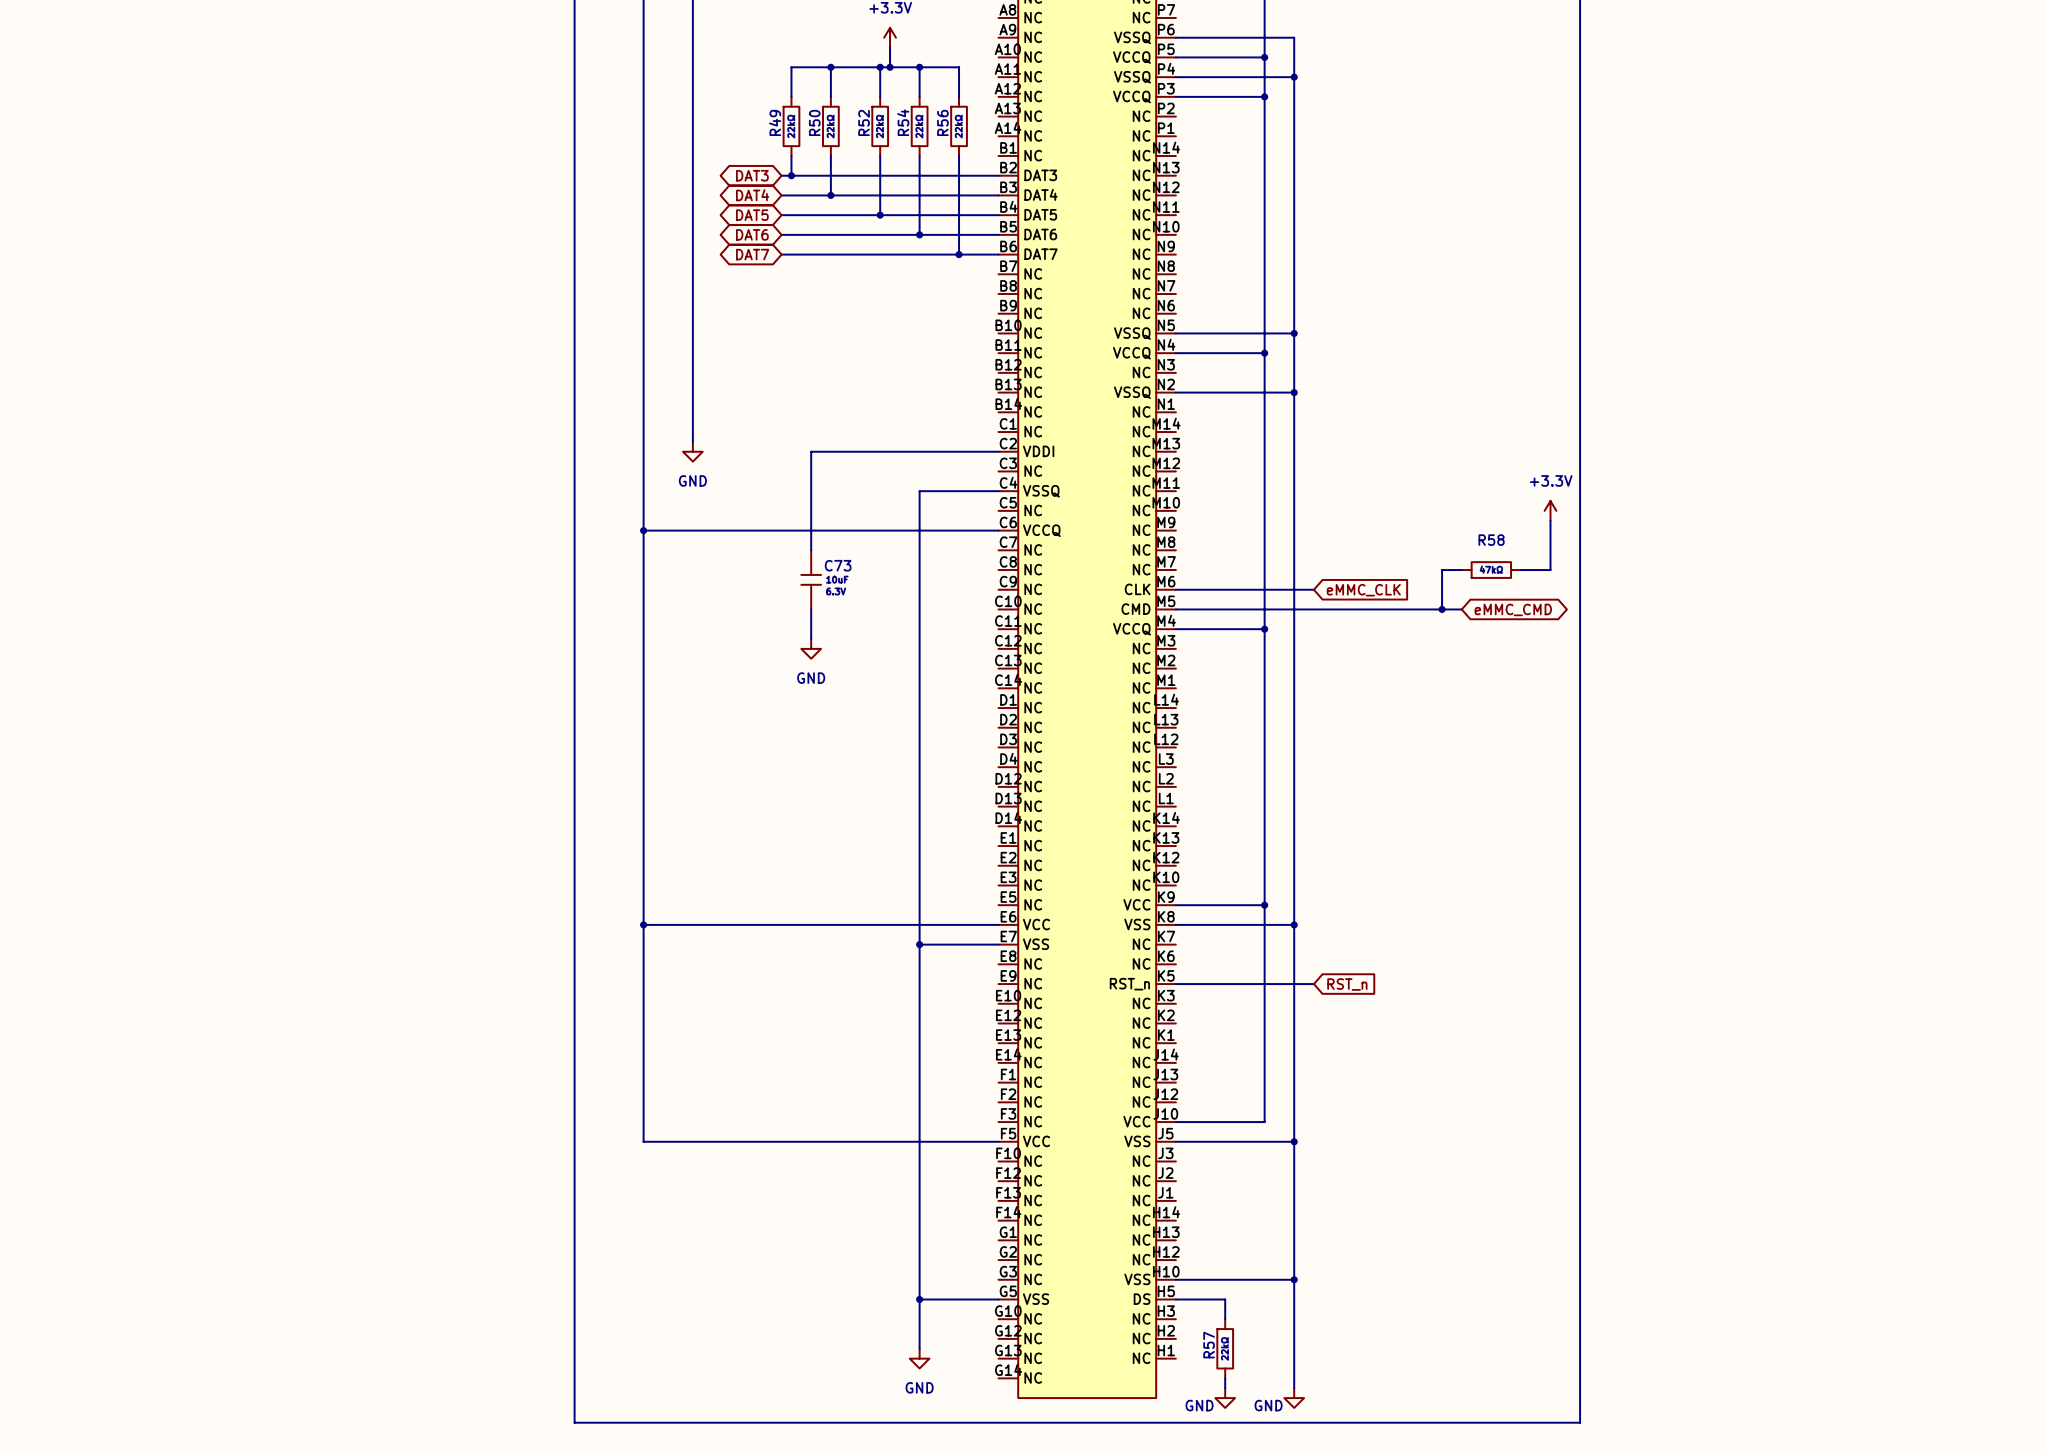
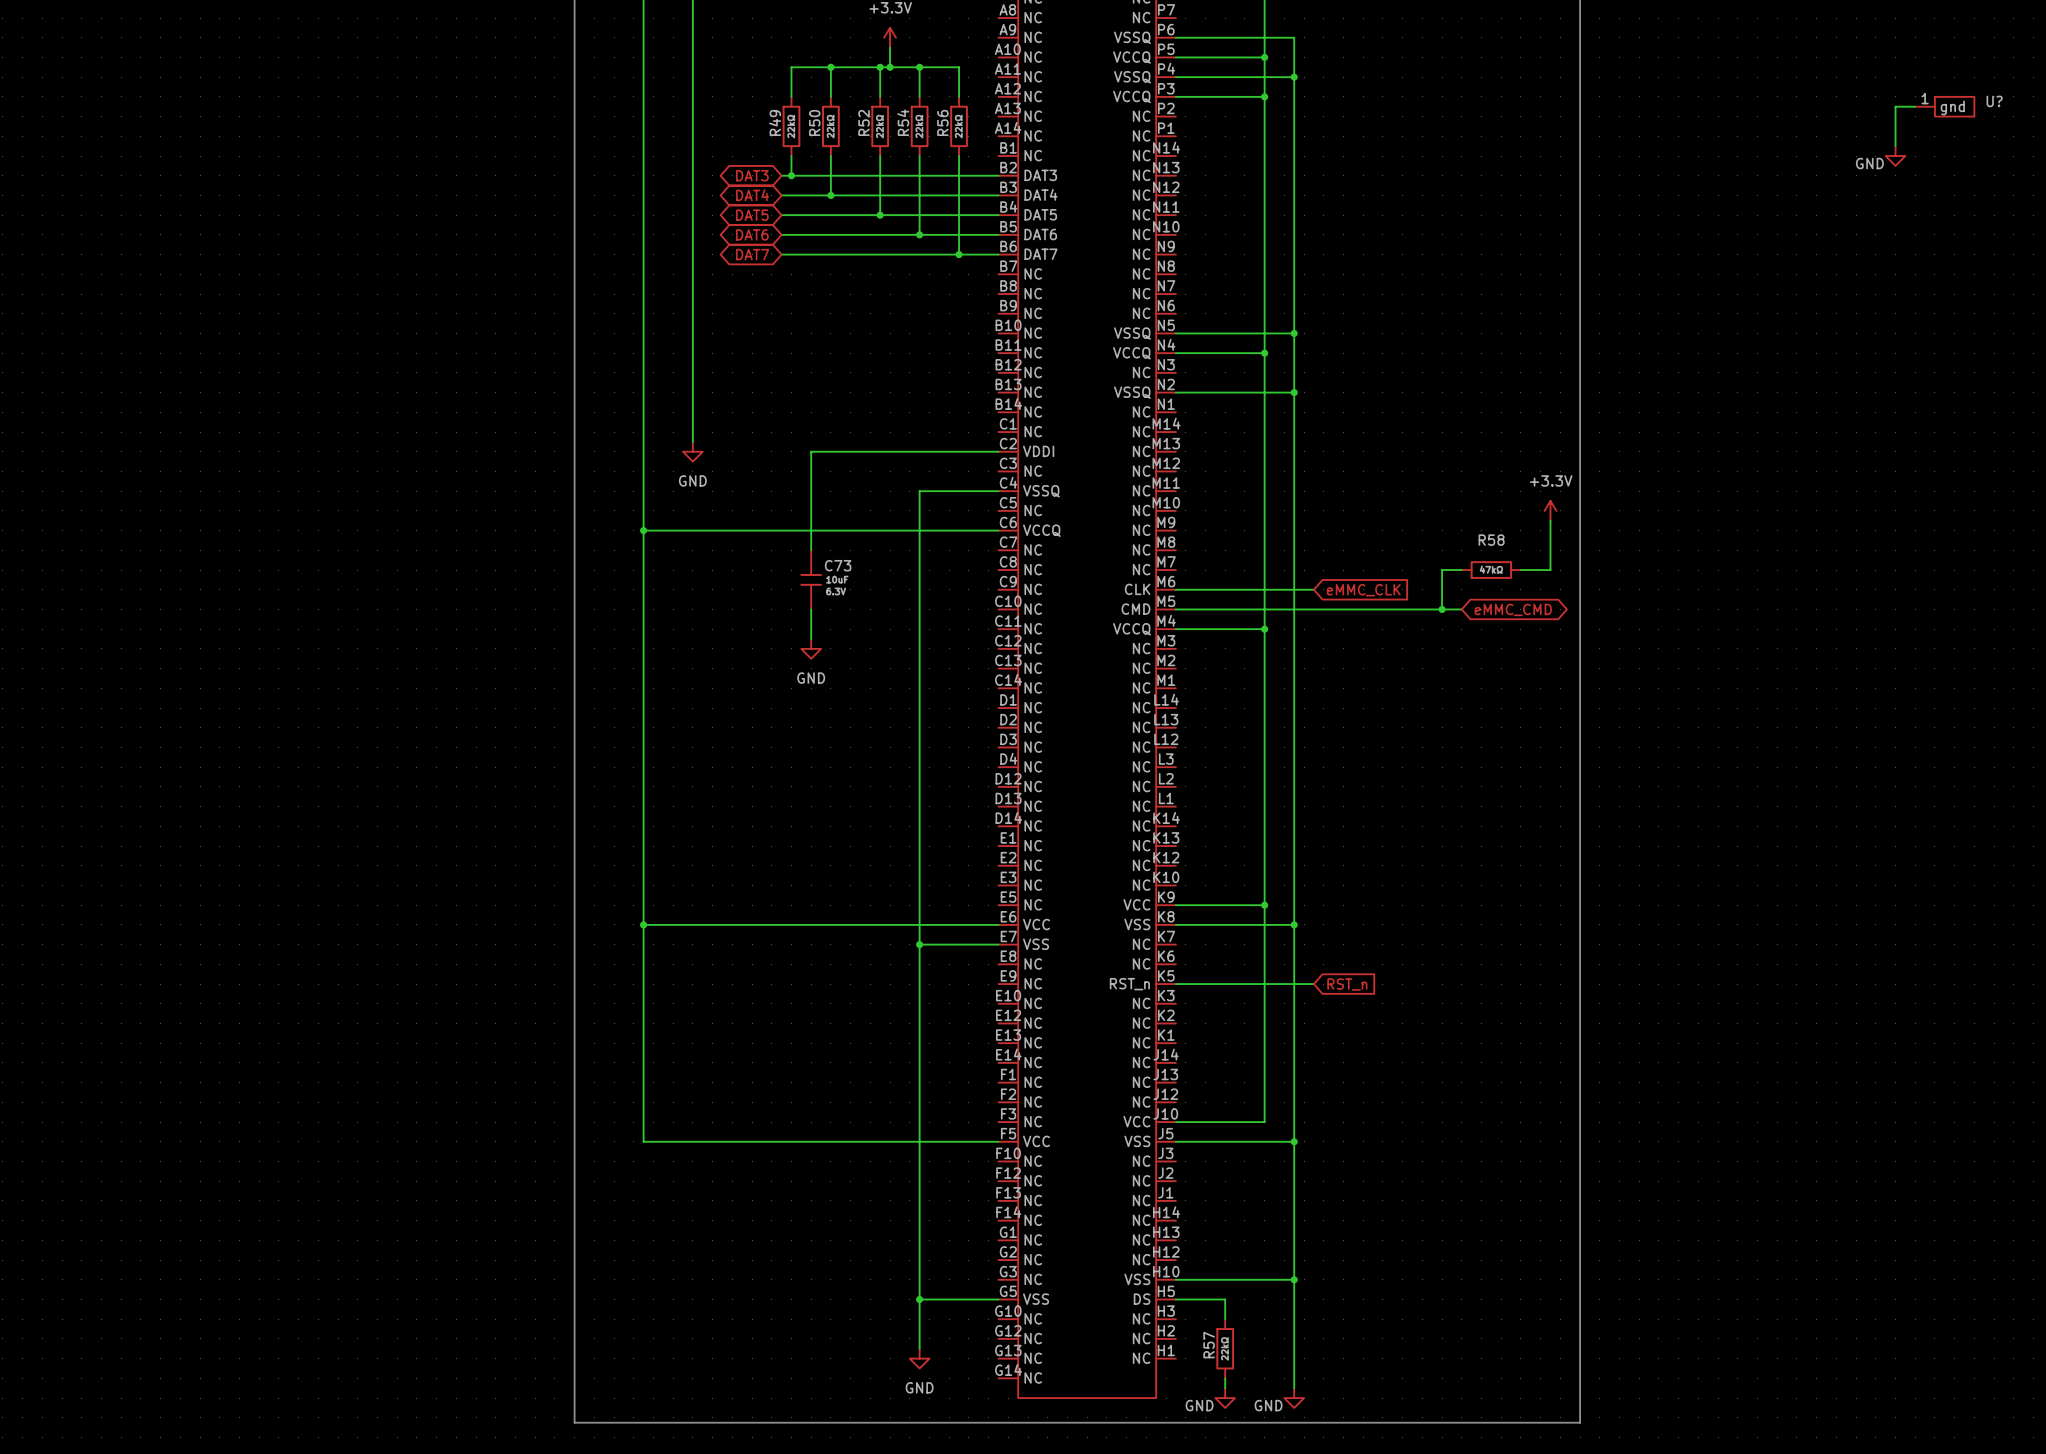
wire: none -> (1915, 106) (1895, 106) (1895, 146)
U?: none -> (1944, 106)
power symbol: none -> GND (1895, 156)

